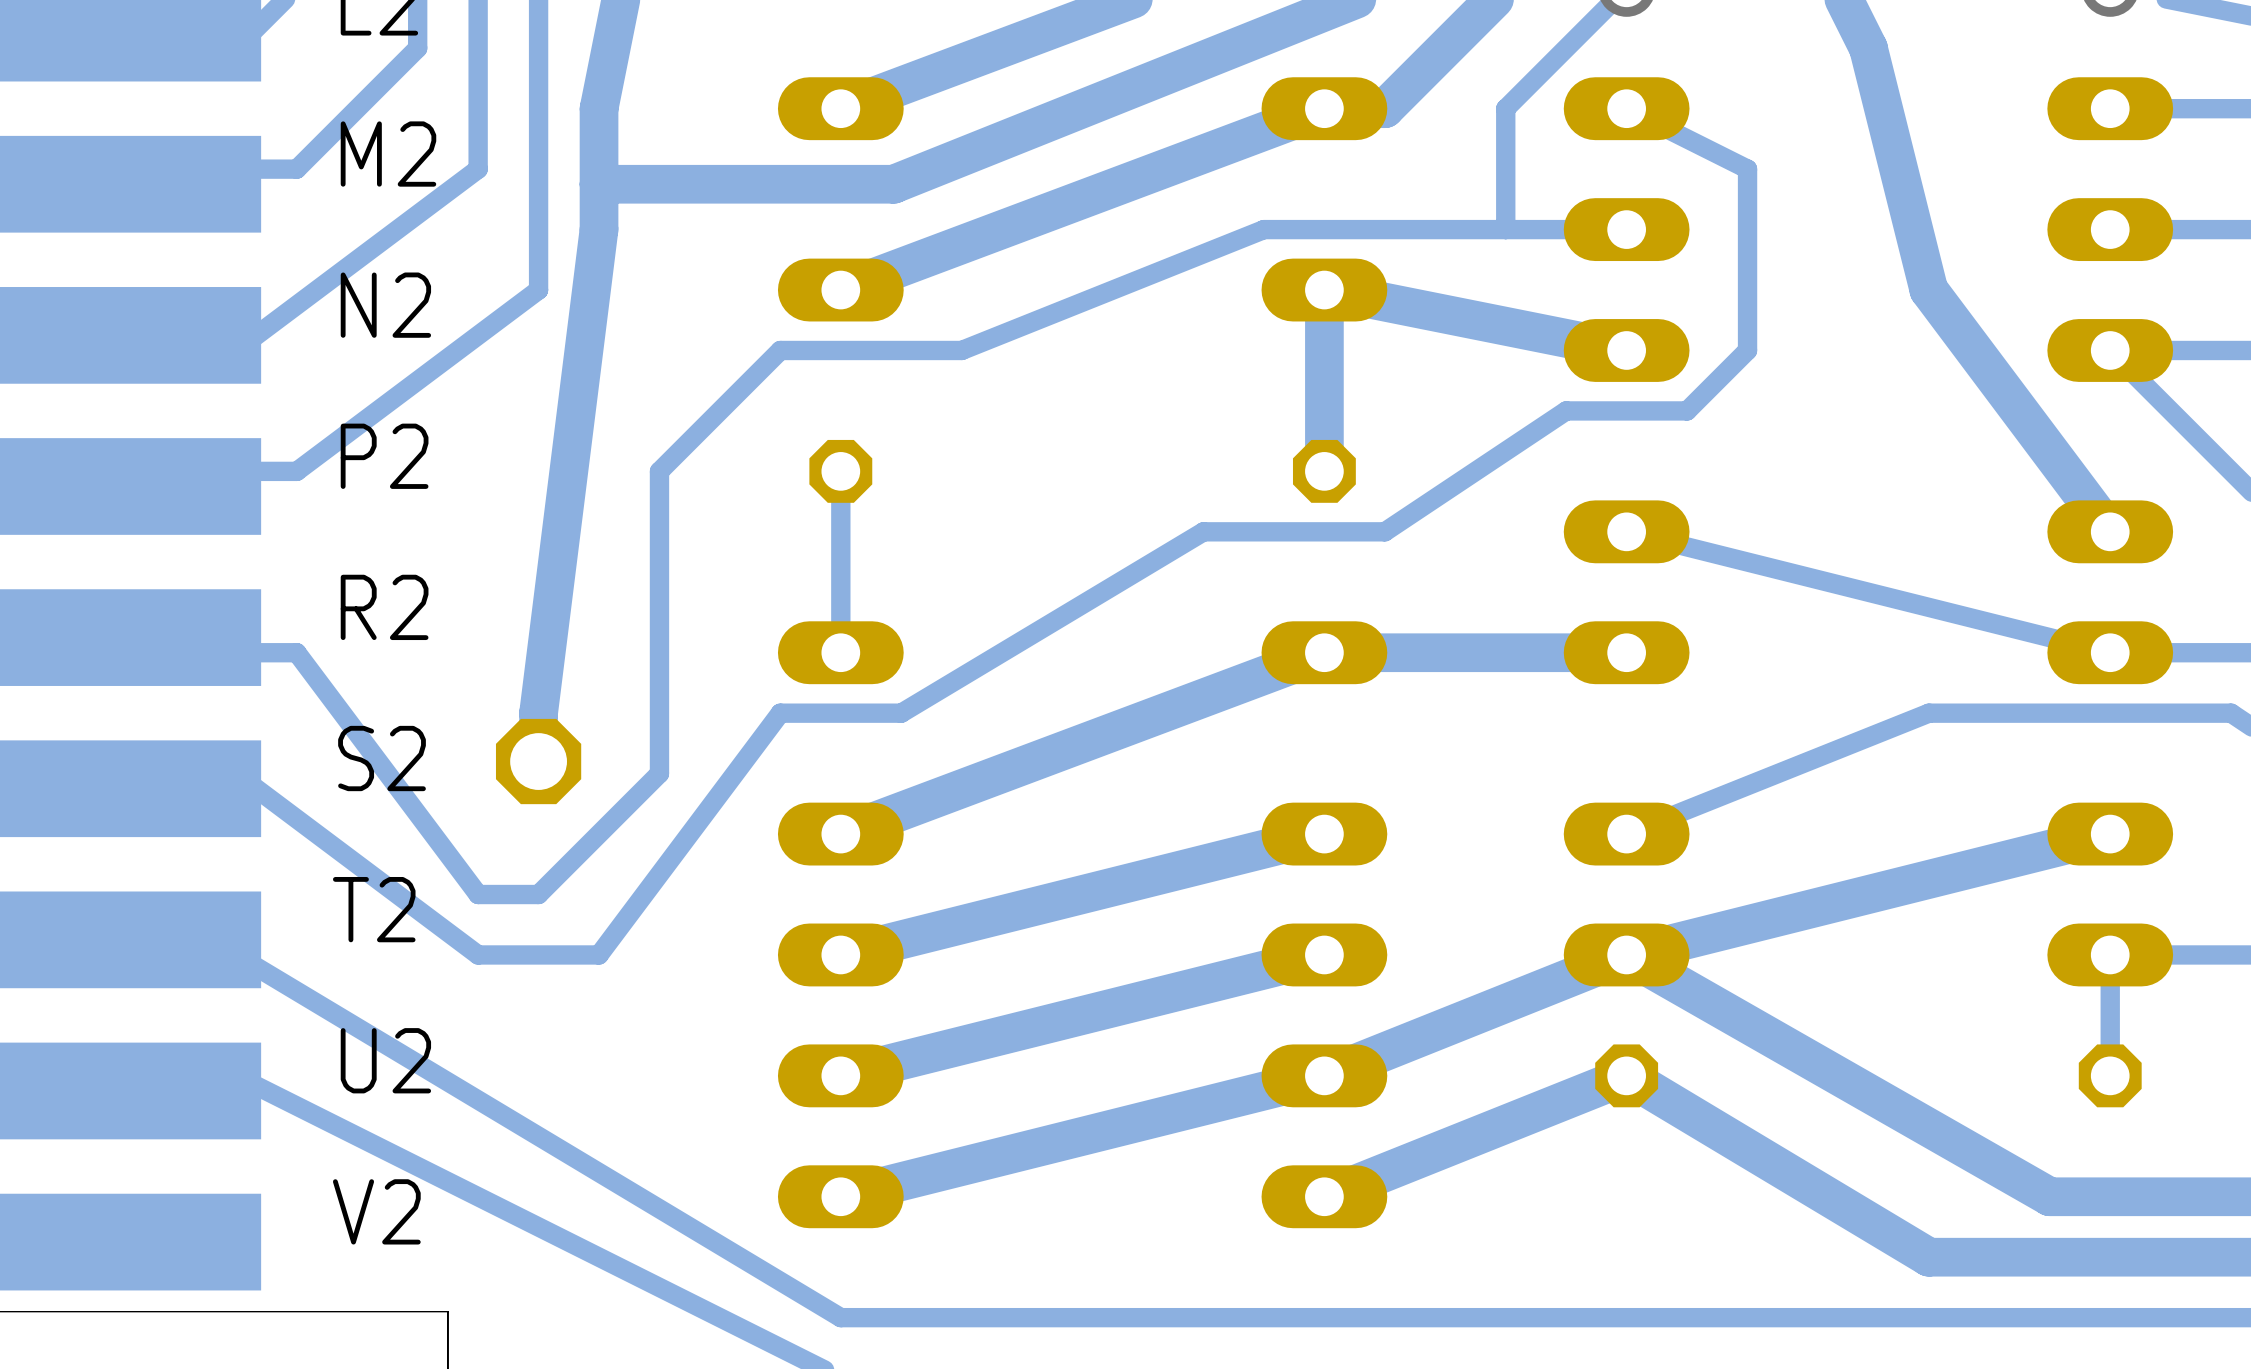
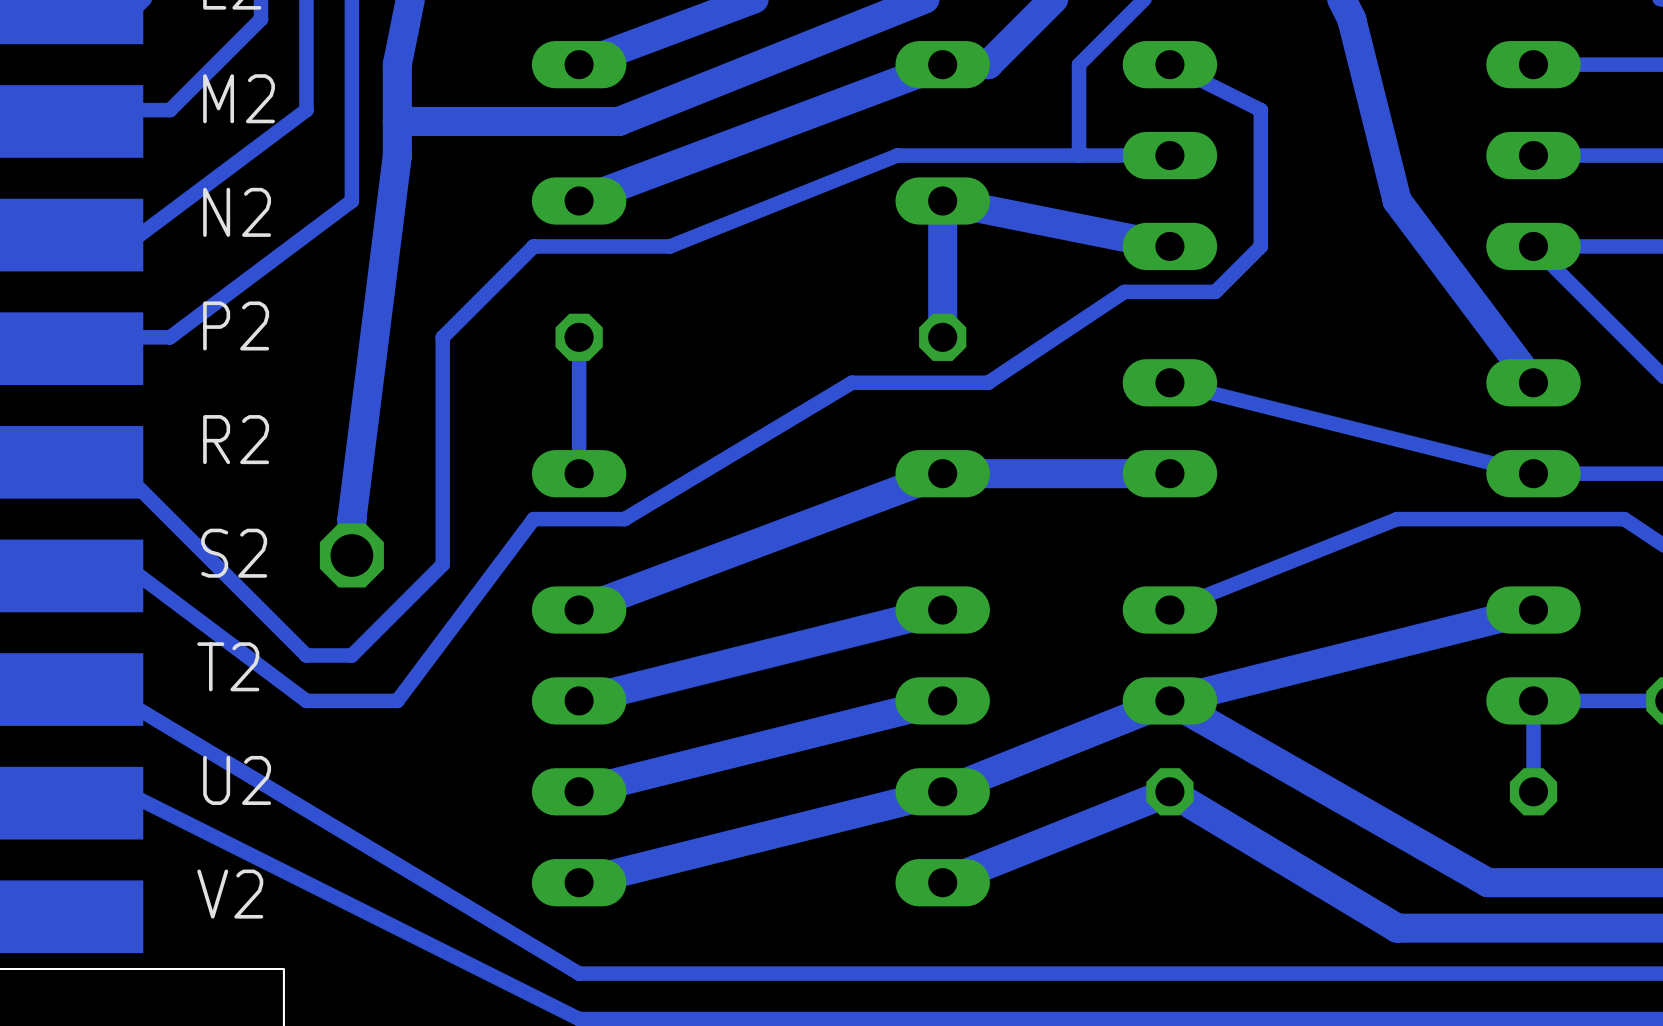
track: (236, 652) (296, 652) (478, 894) -> (124, 473) (306, 655)

